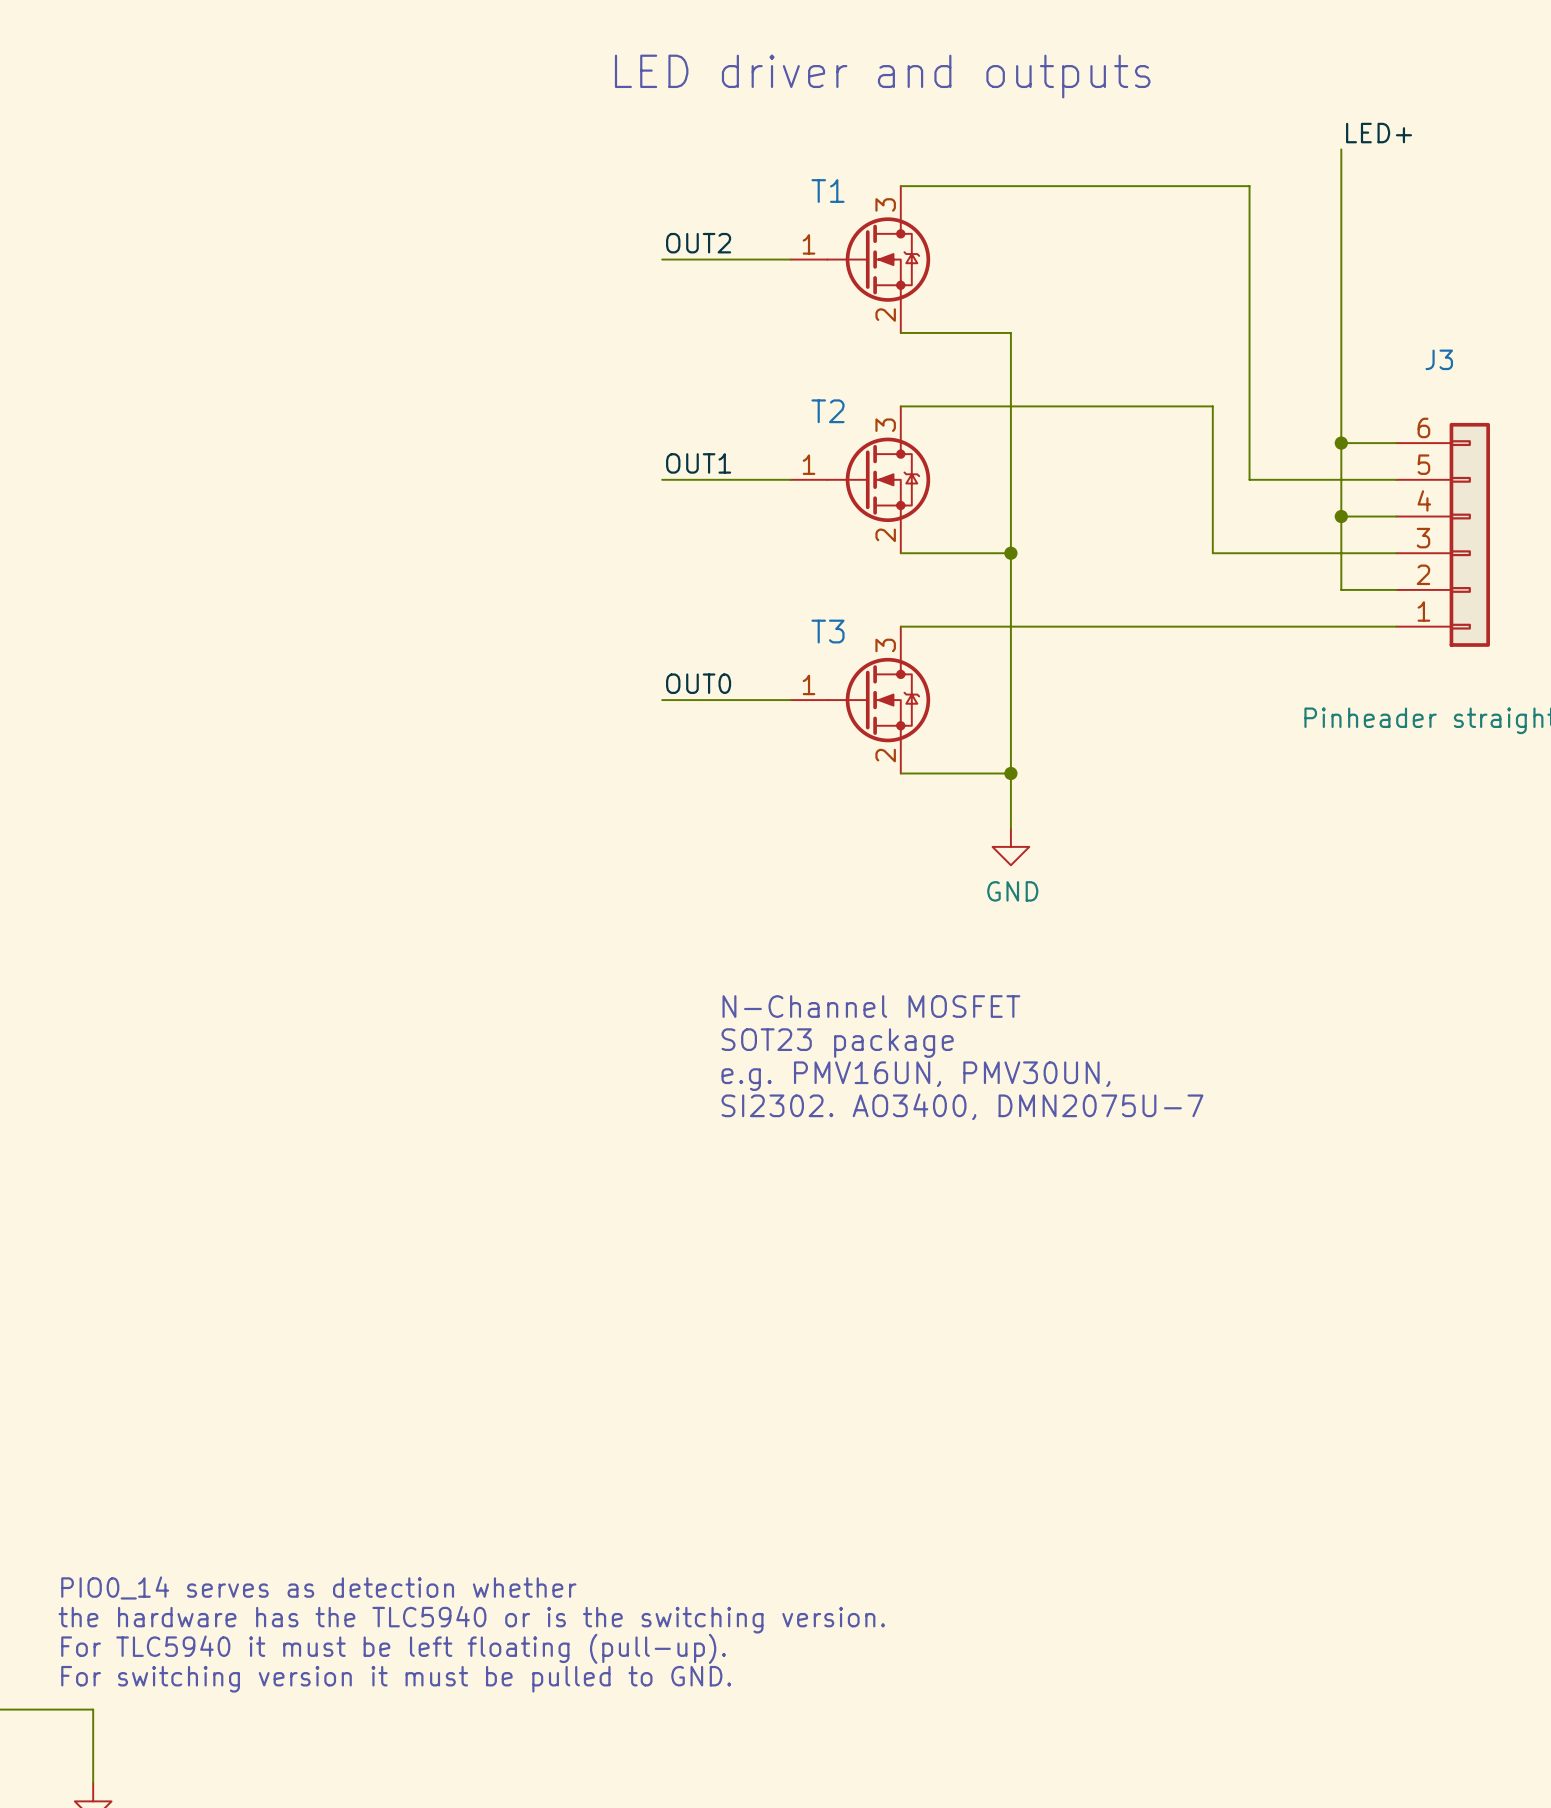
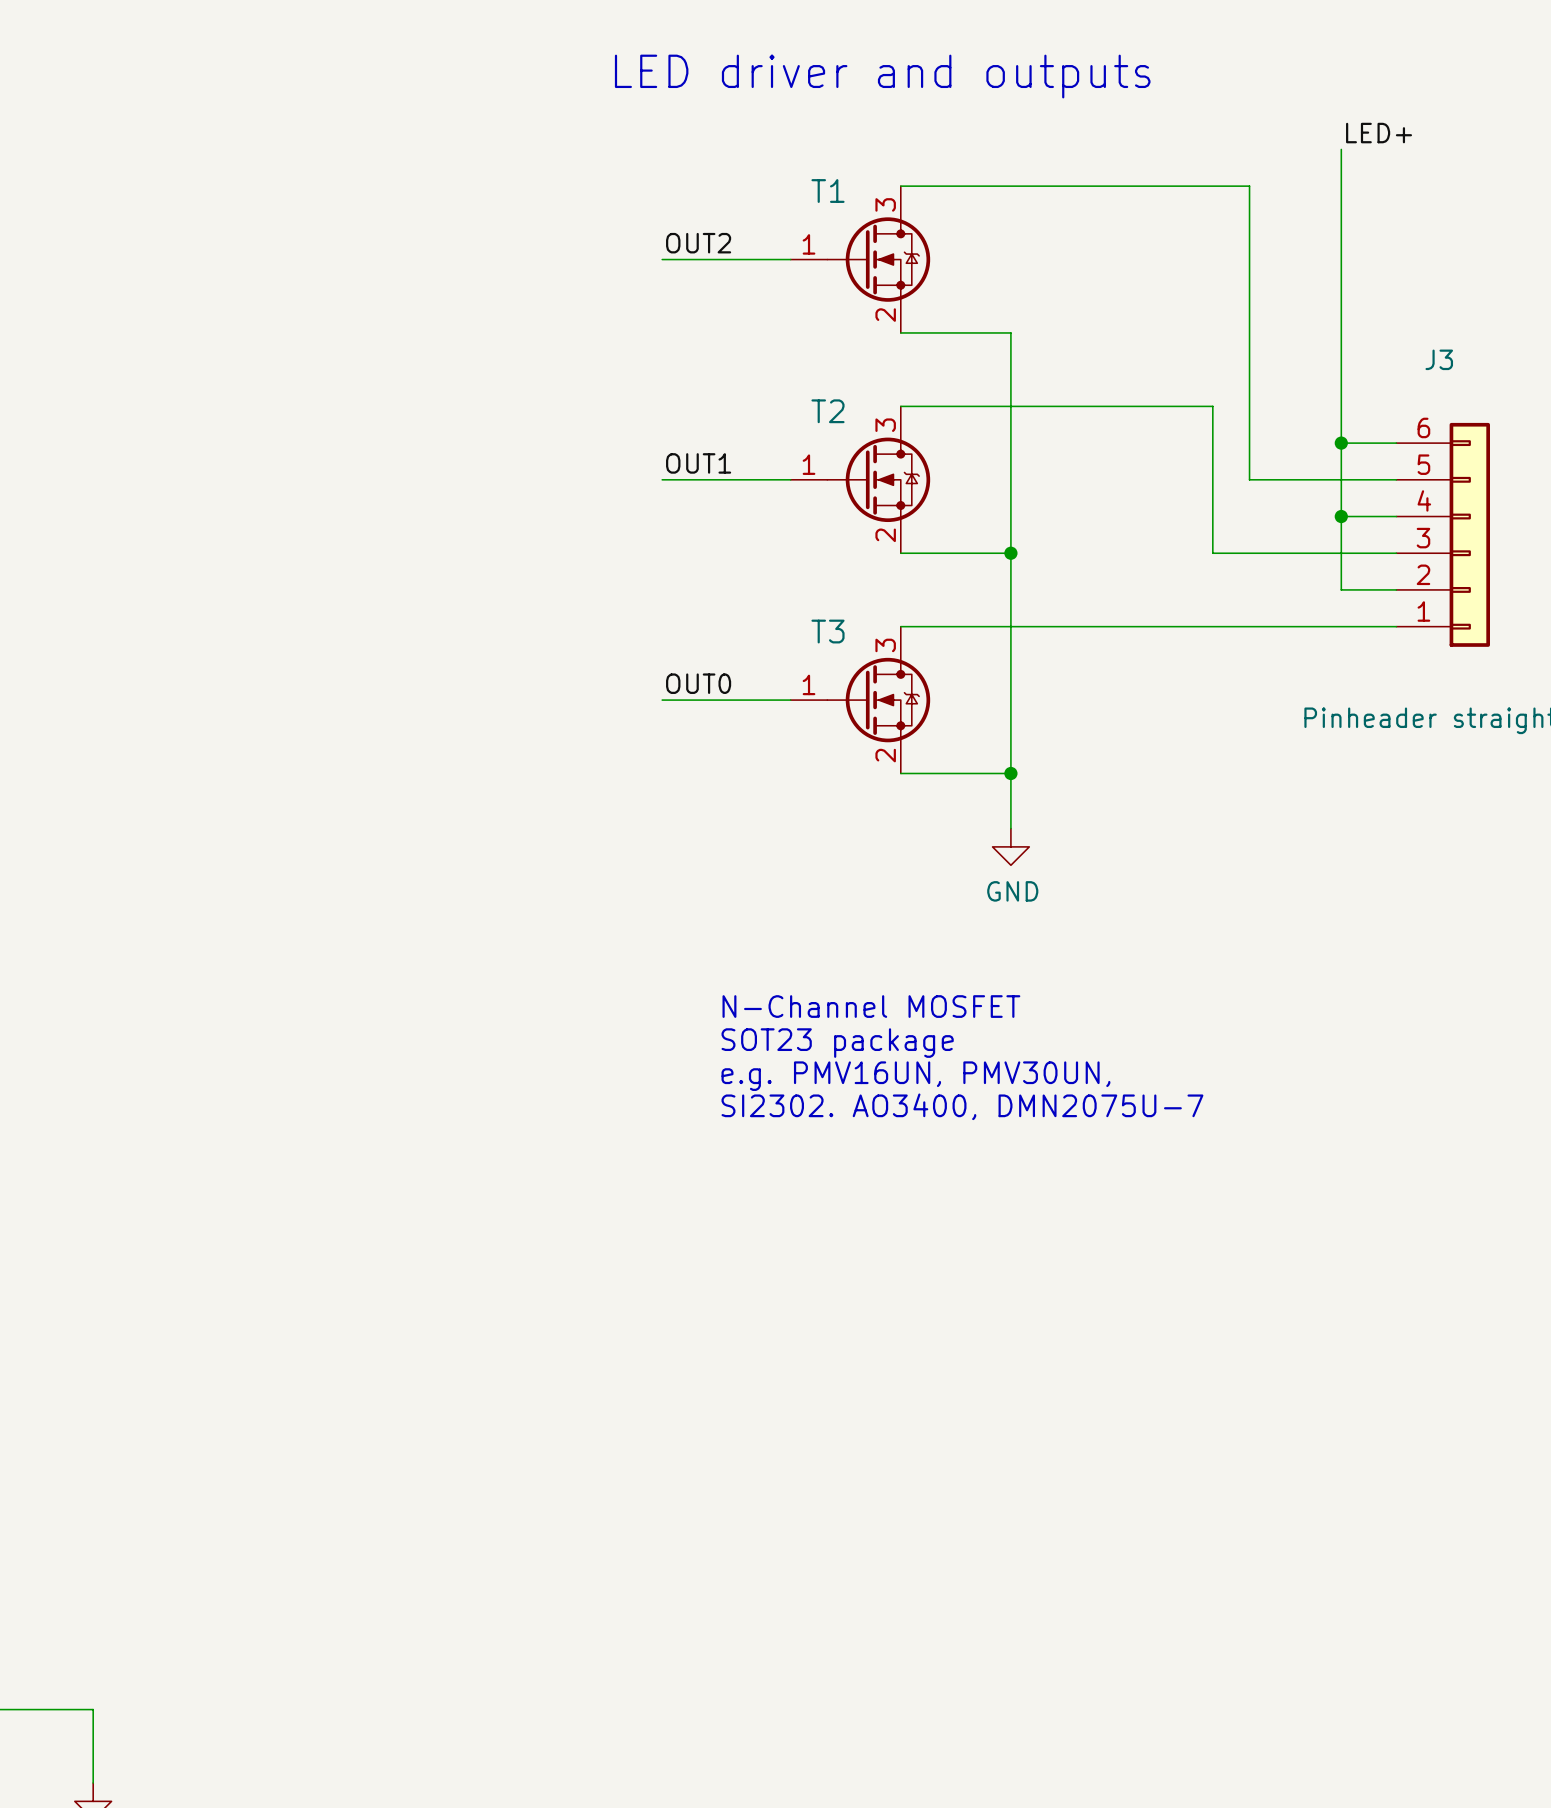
text: PIO0_14 serves as detection whether (318, 1587) -> none
text: the hardware has the TLC5940 or is the switching version. (471, 1619) -> none
text: For TLC5940 it must be left floating (pull-up). (393, 1648) -> none
text: For switching version it must be pulled to GND. (396, 1679) -> none

